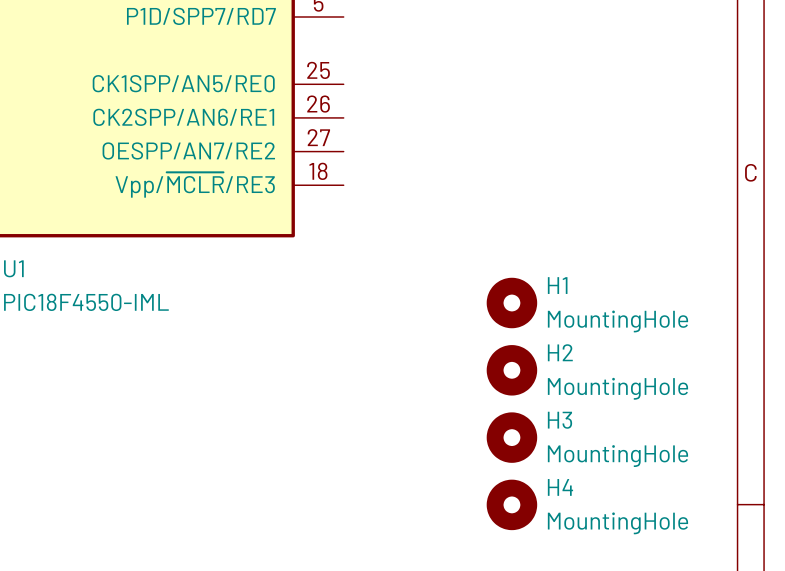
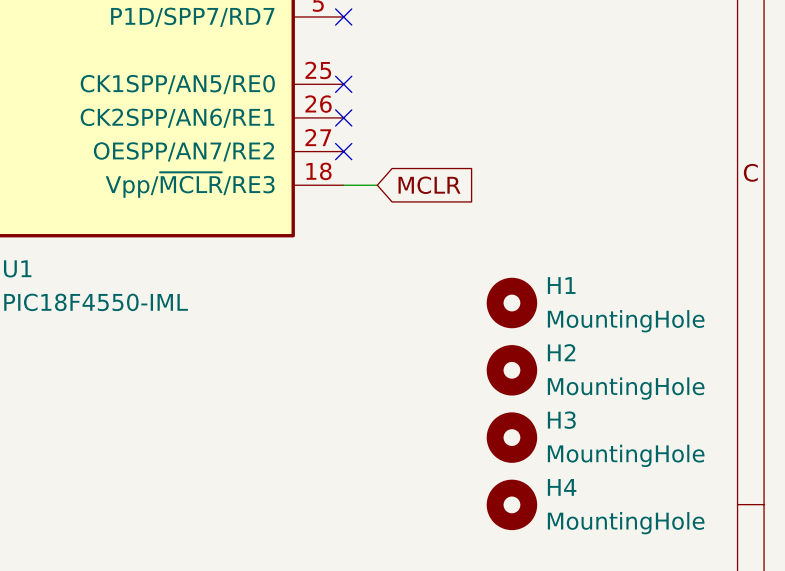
no-connect mark: none -> (343, 17)
no-connect mark: none -> (343, 84)
no-connect mark: none -> (343, 117)
no-connect mark: none -> (343, 151)
wire: none -> (343, 185) (377, 185)
global label: none -> MCLR (429, 185)

